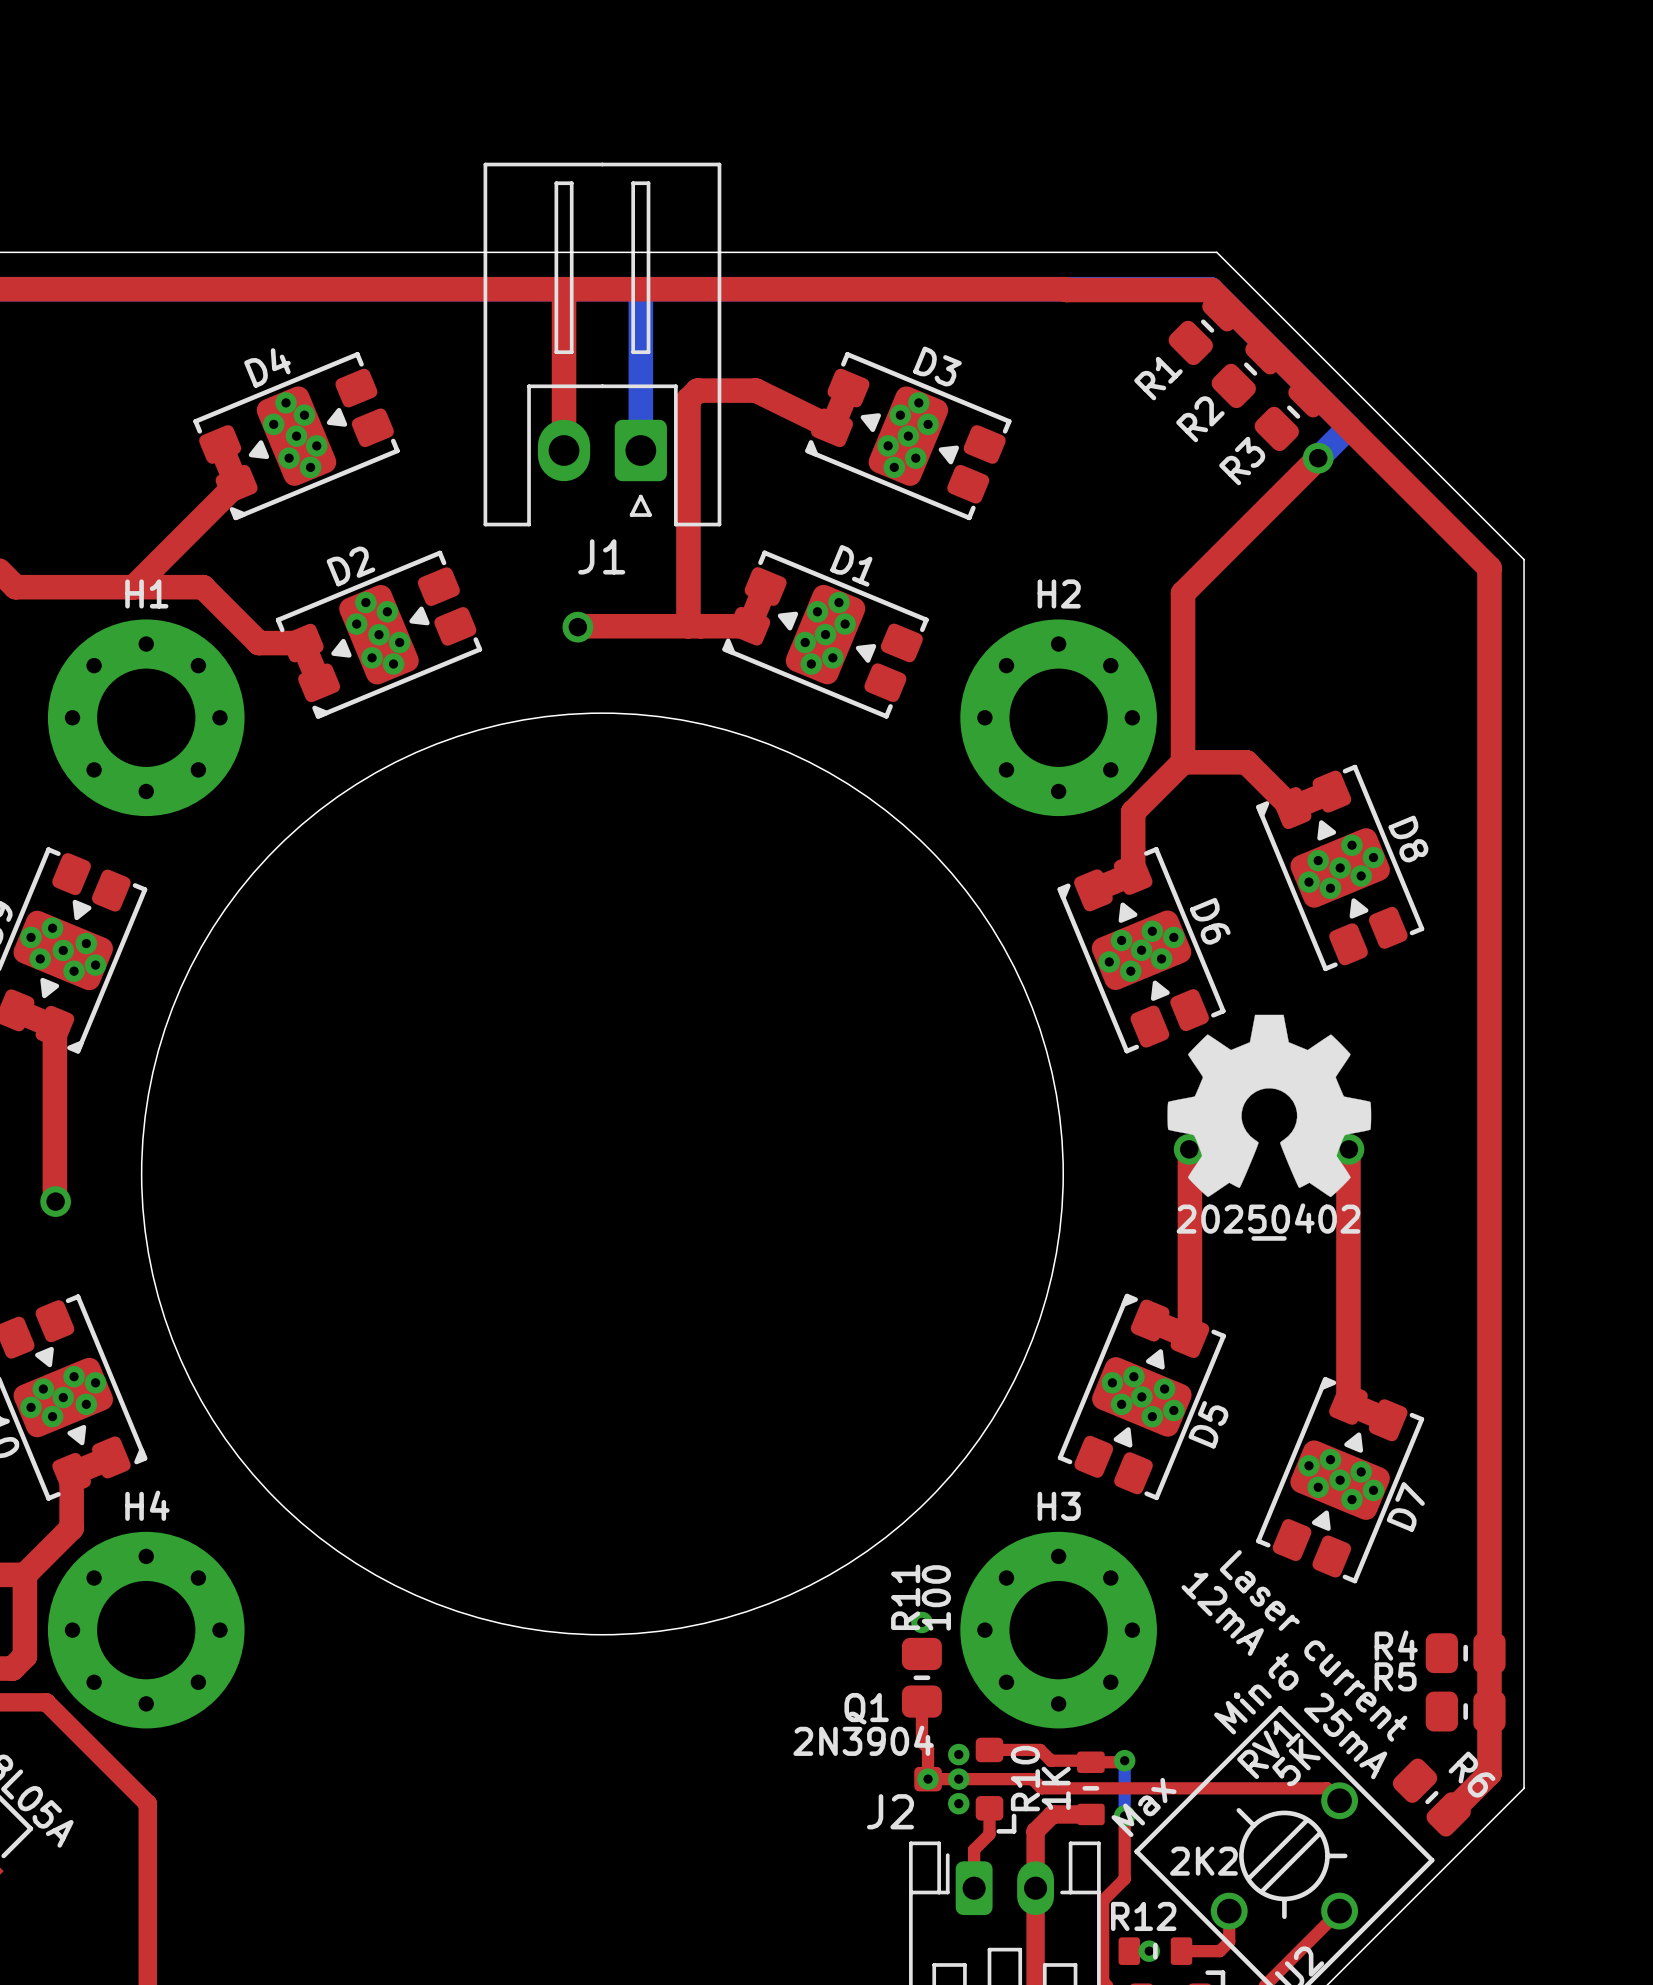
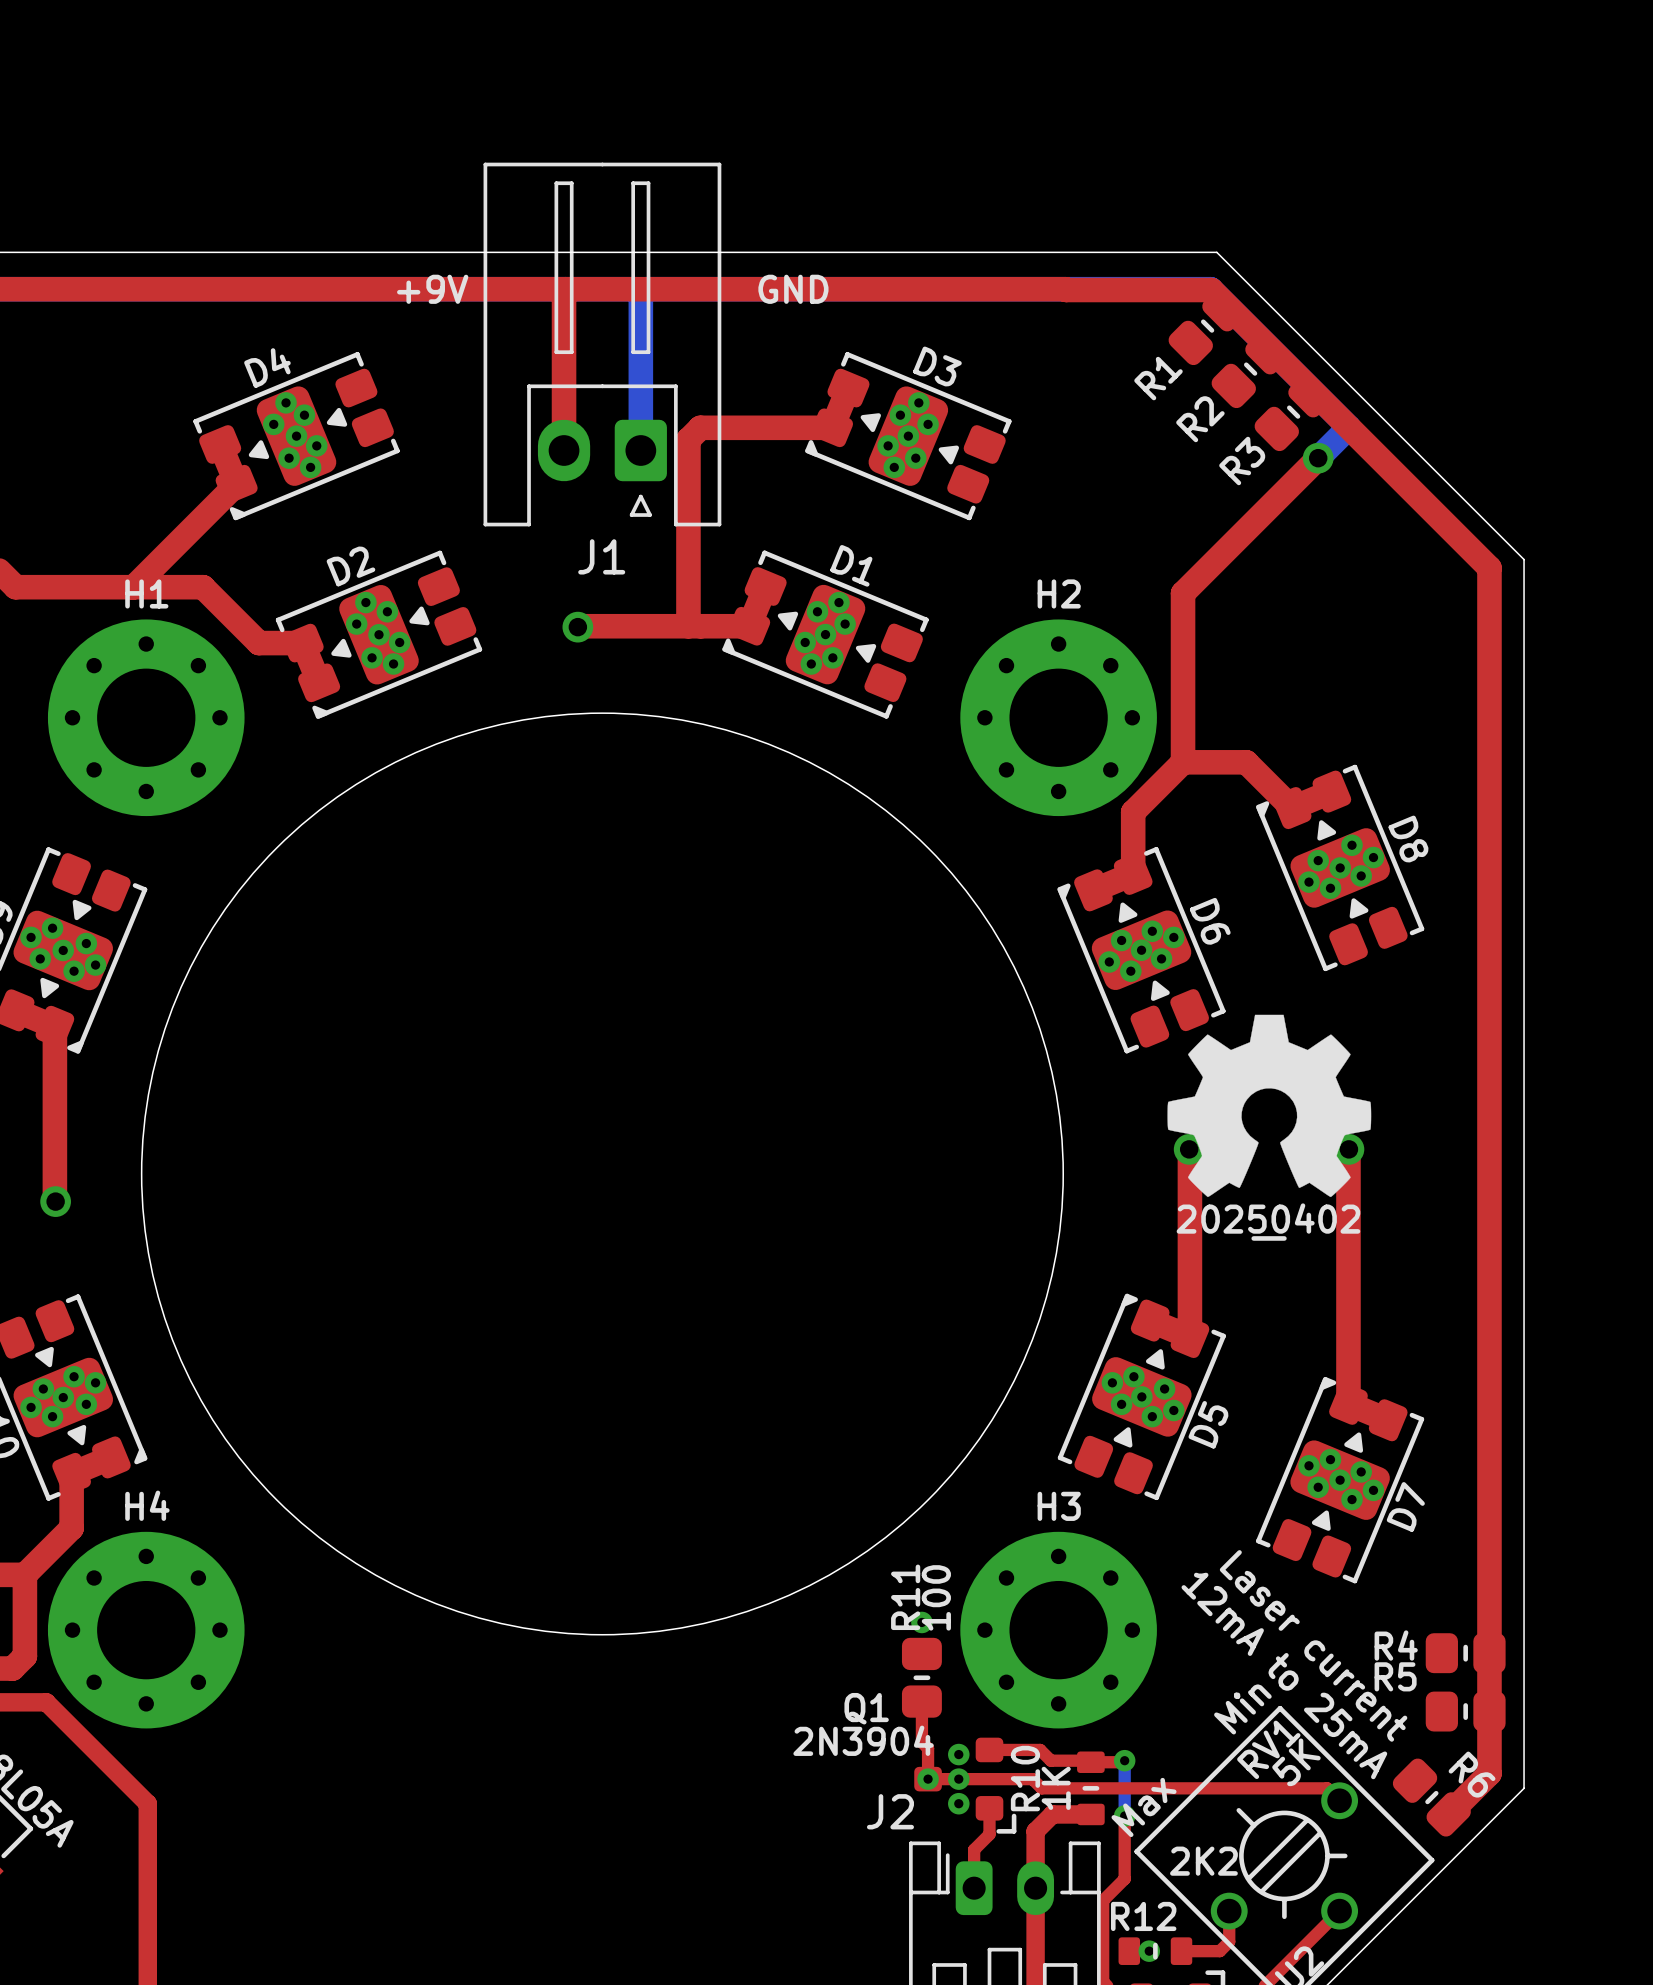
text: none -> +9V (432, 289)
text: none -> GND (793, 289)
top track: (832, 427) (756, 390) (697, 390) (688, 399) (688, 439) -> (832, 427) (700, 427) (688, 439)

